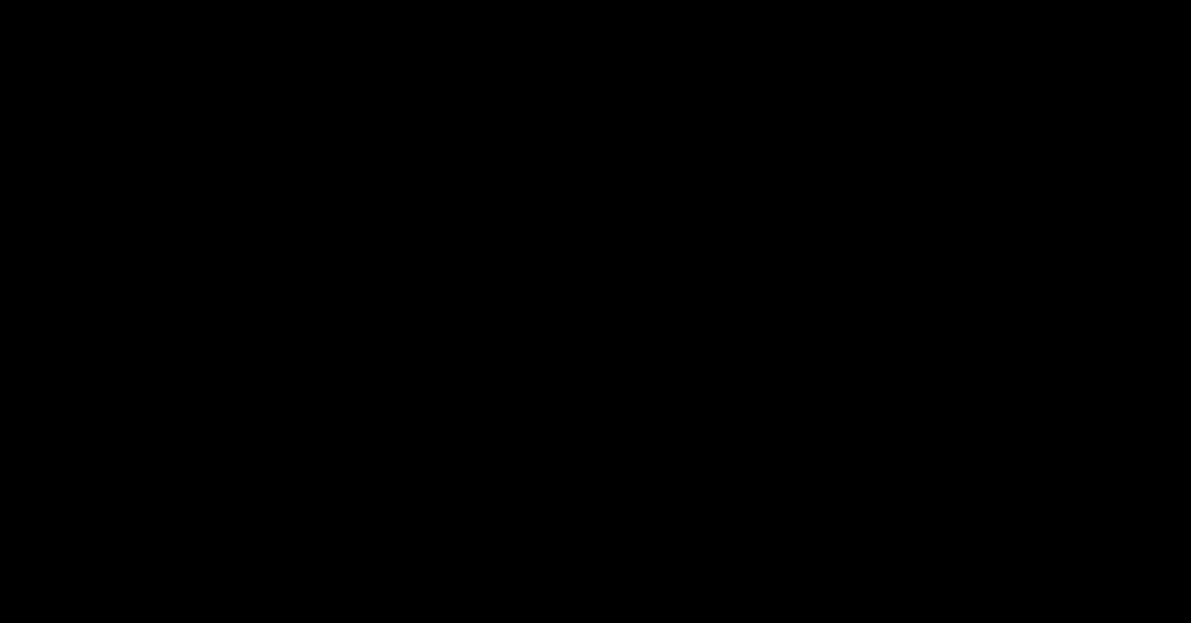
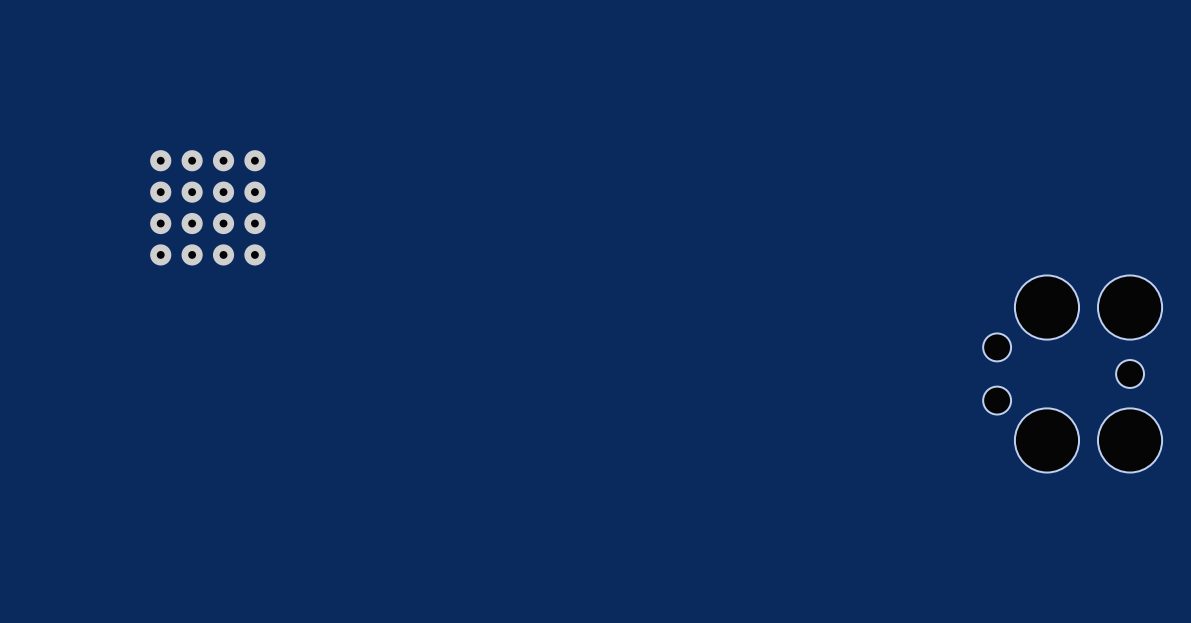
part: none -> (207, 207)
part: none -> (1072, 373)

